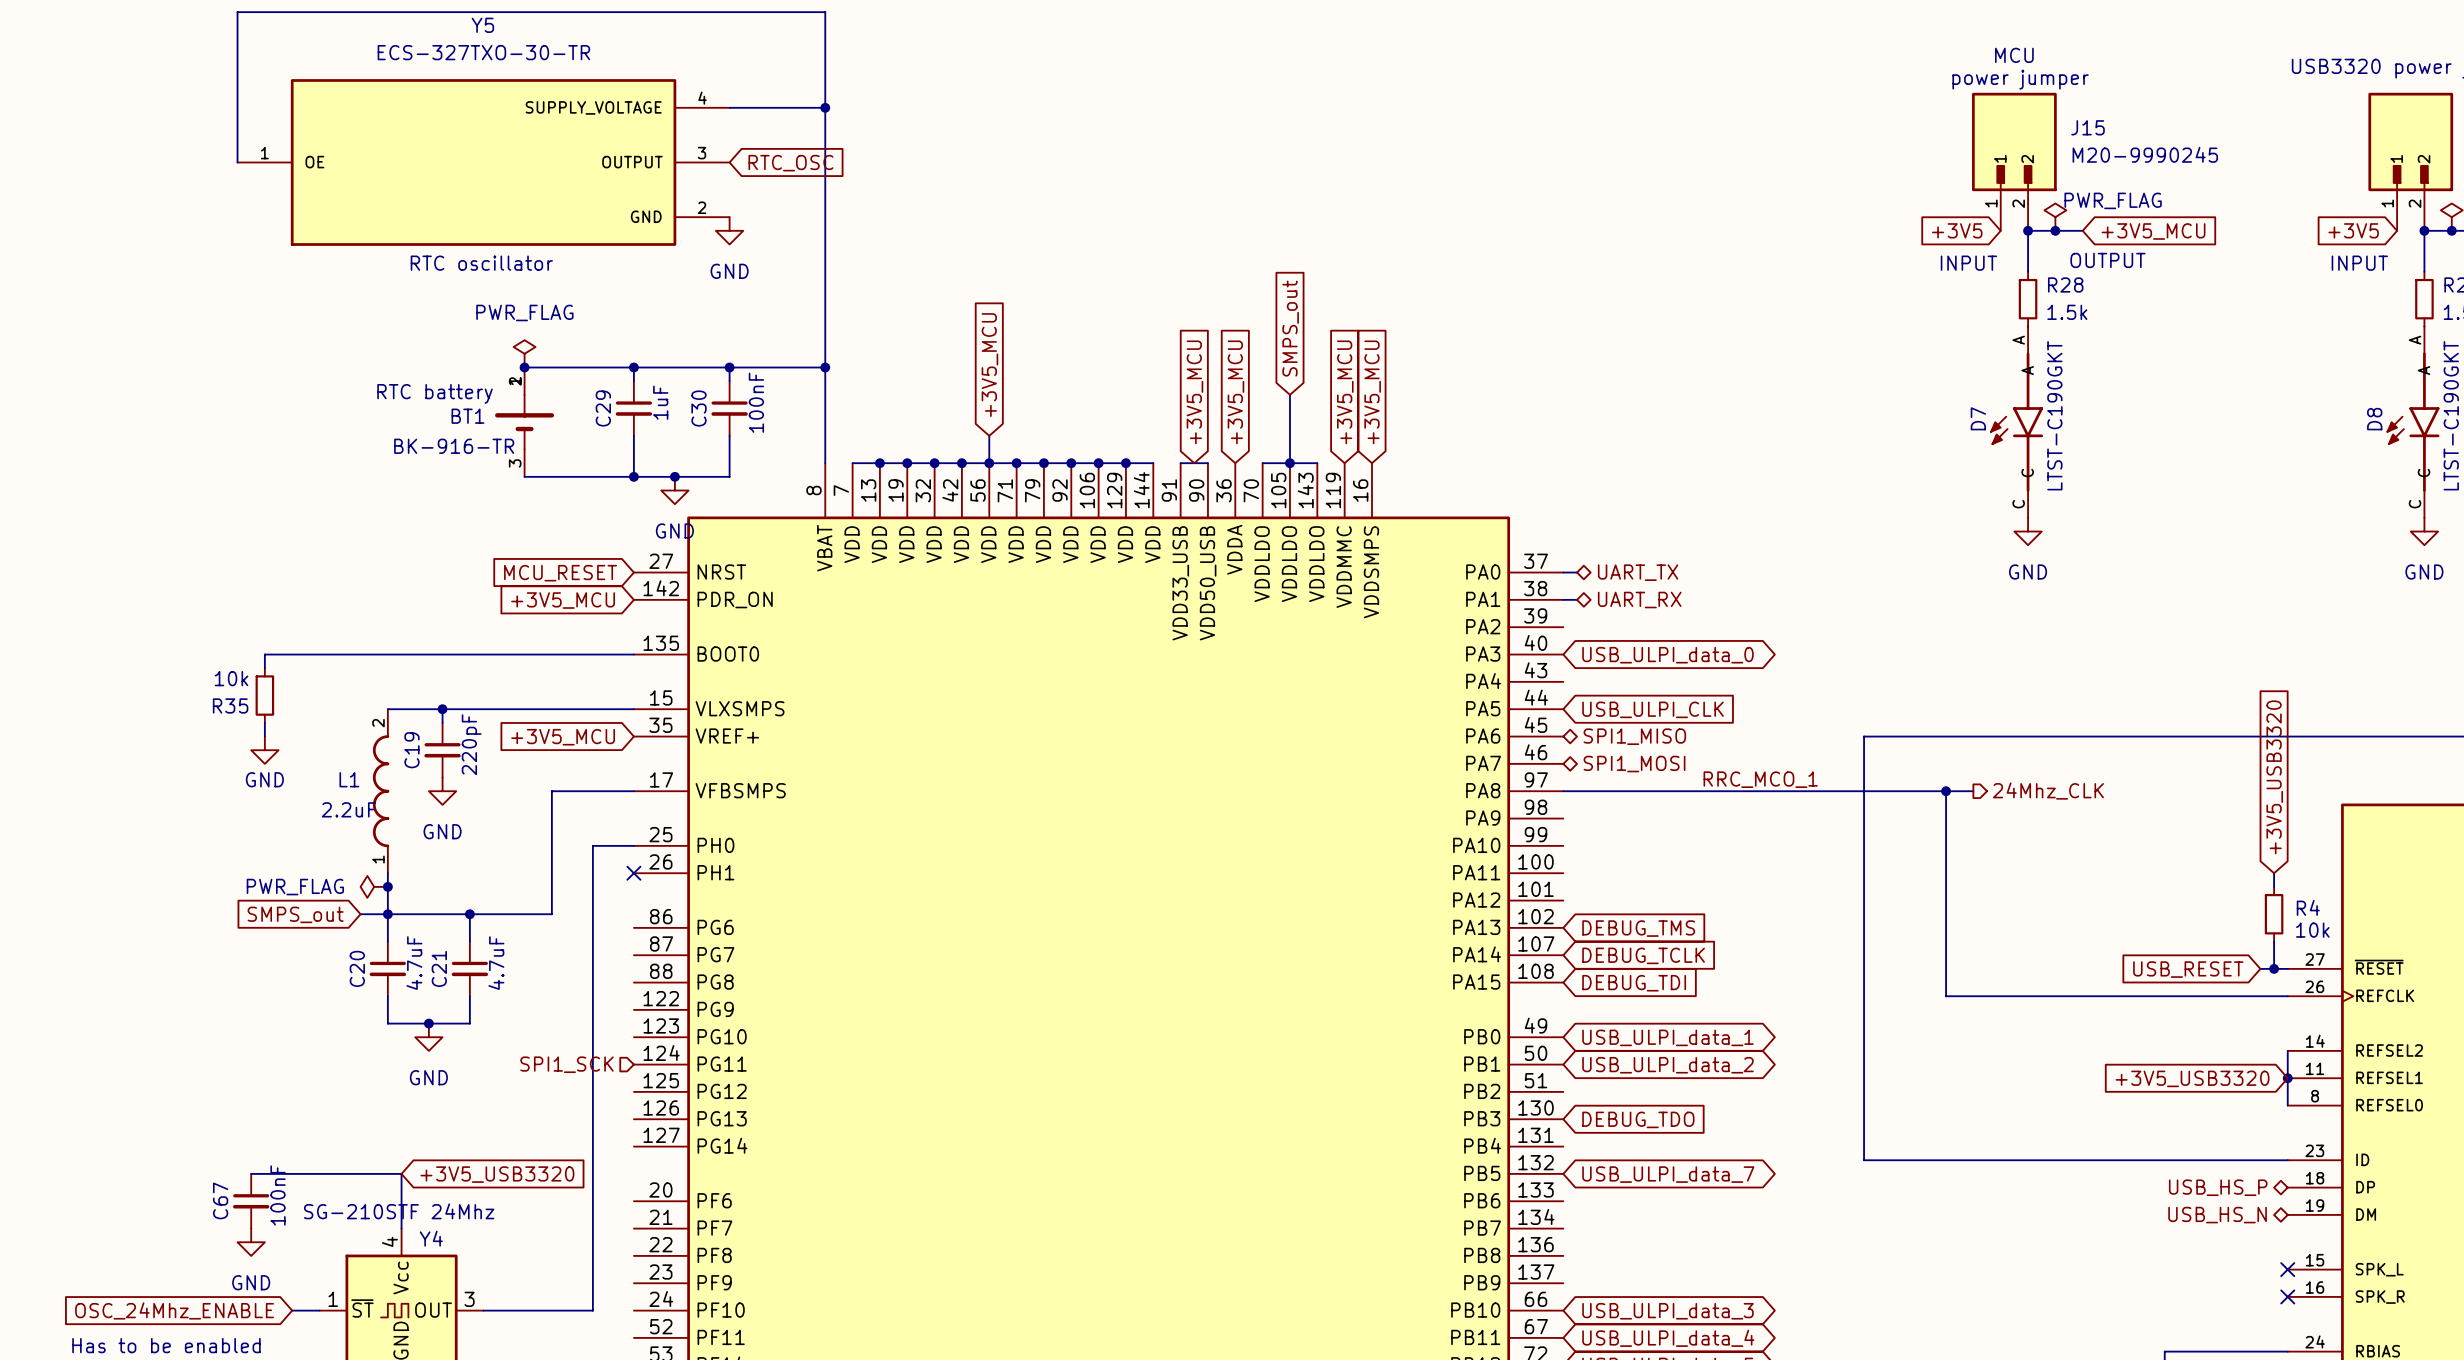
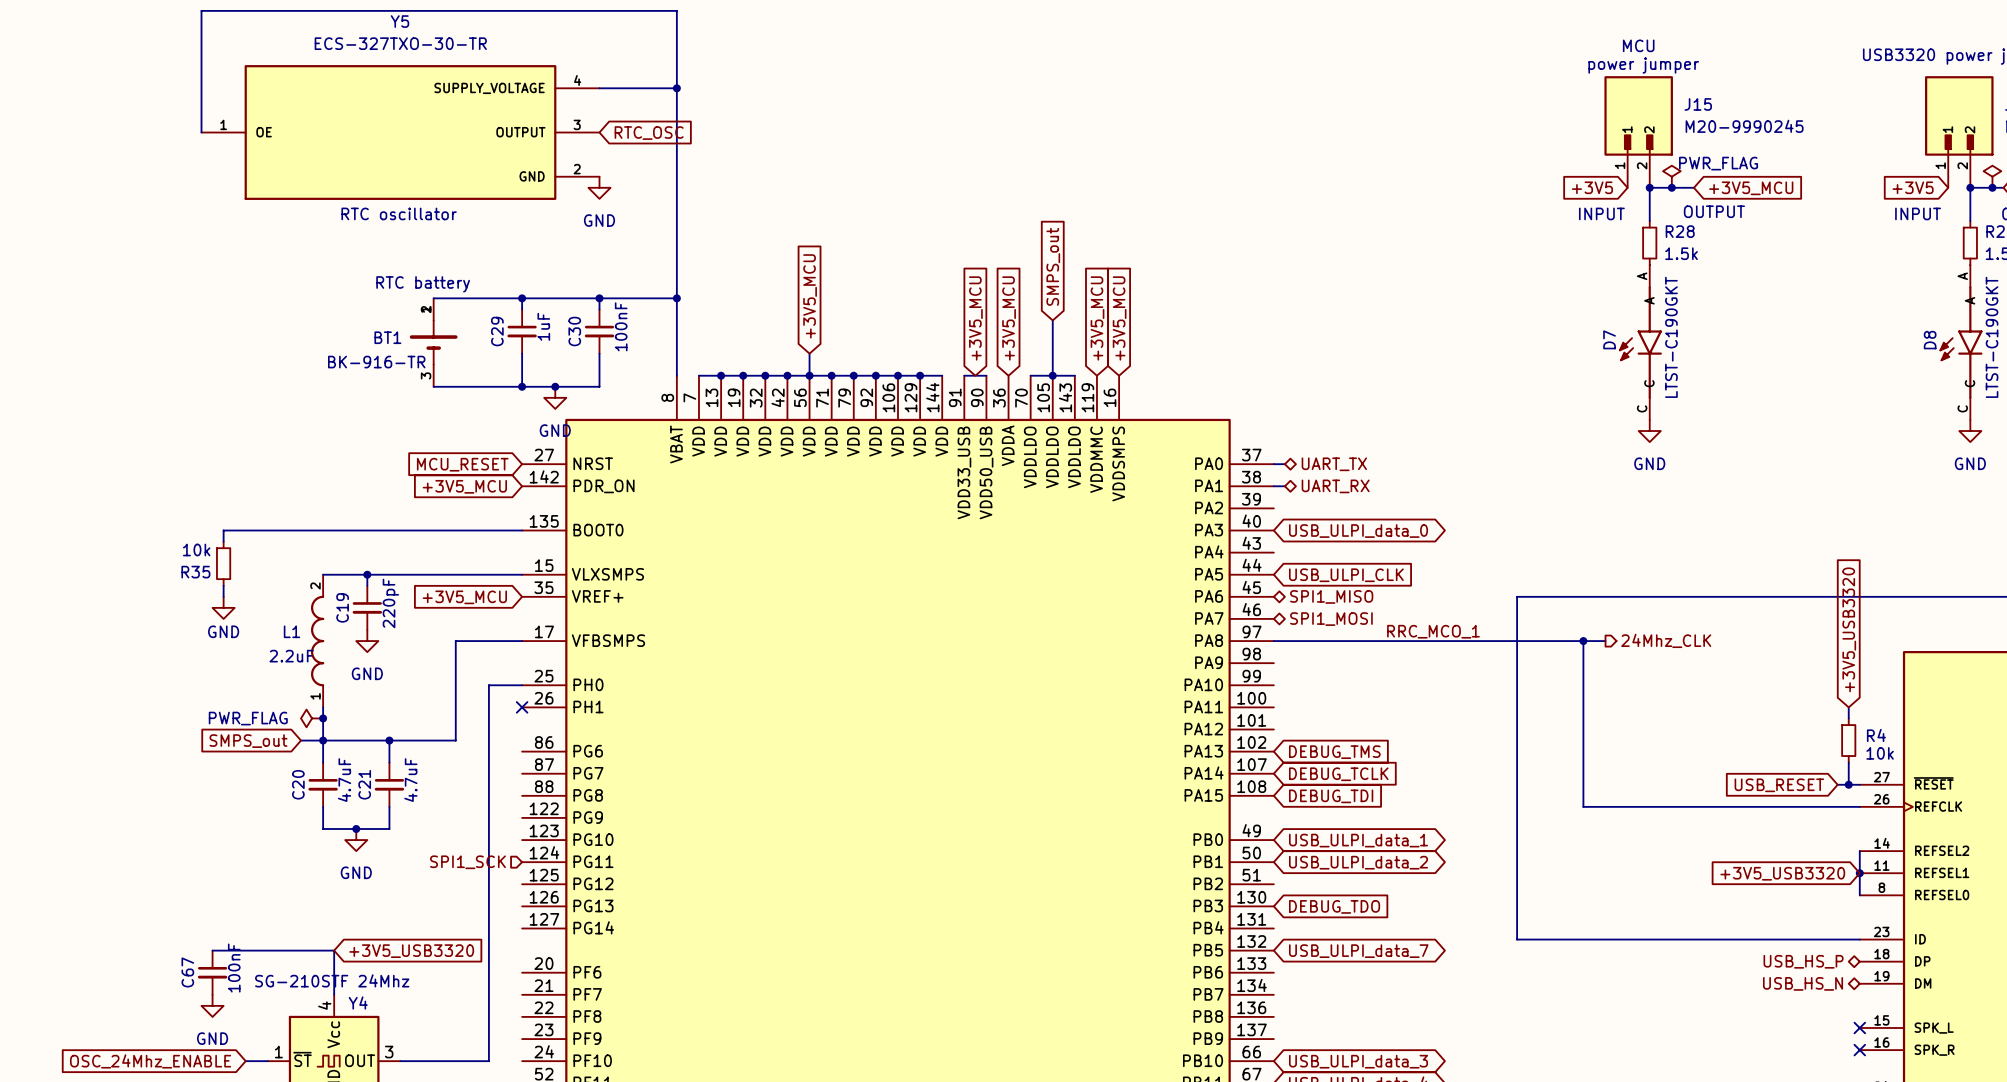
power symbol: PWR_FLAG (524, 353) -> none
junction: (524, 367) -> none
text position: RTC battery (435, 393) -> RTC battery (423, 284)

